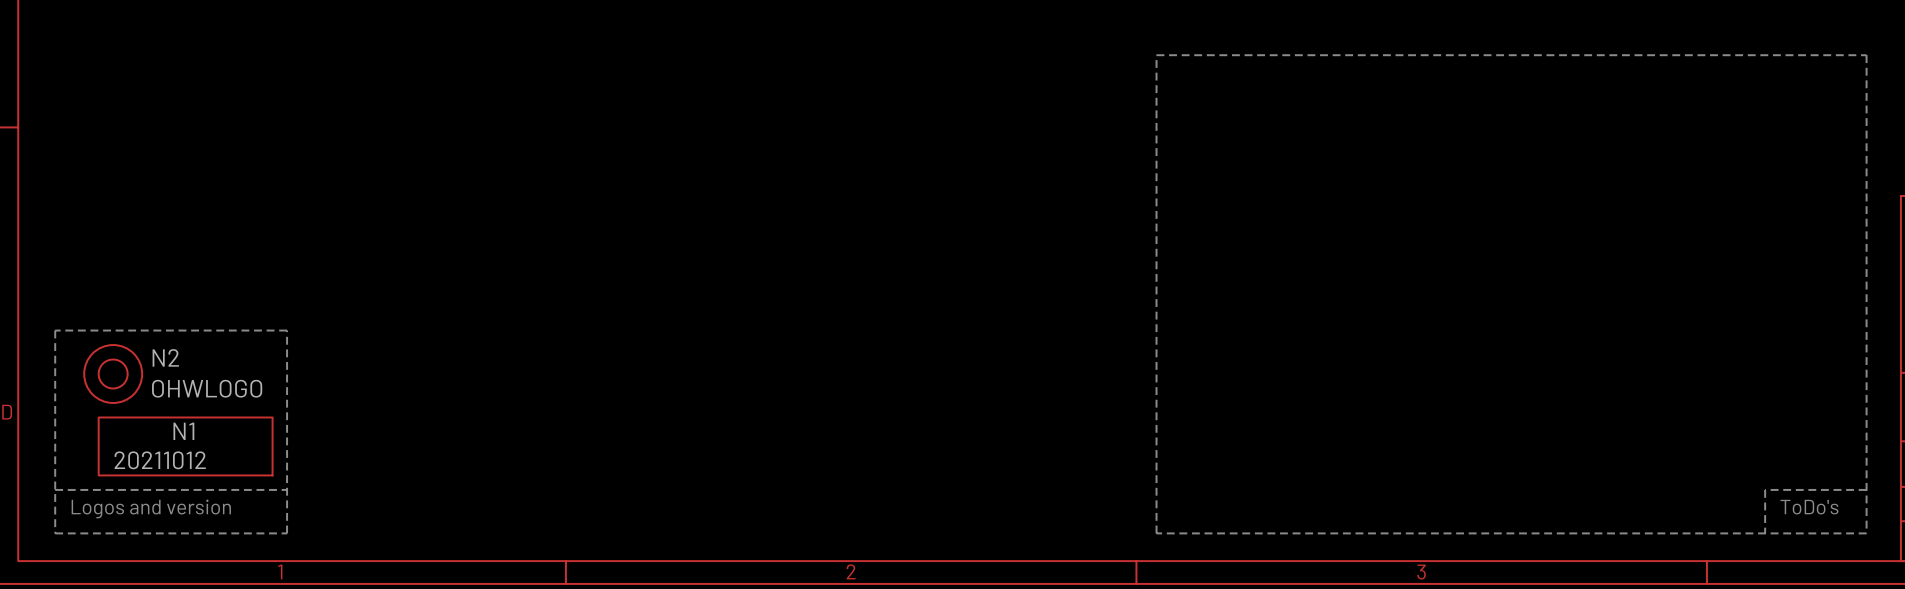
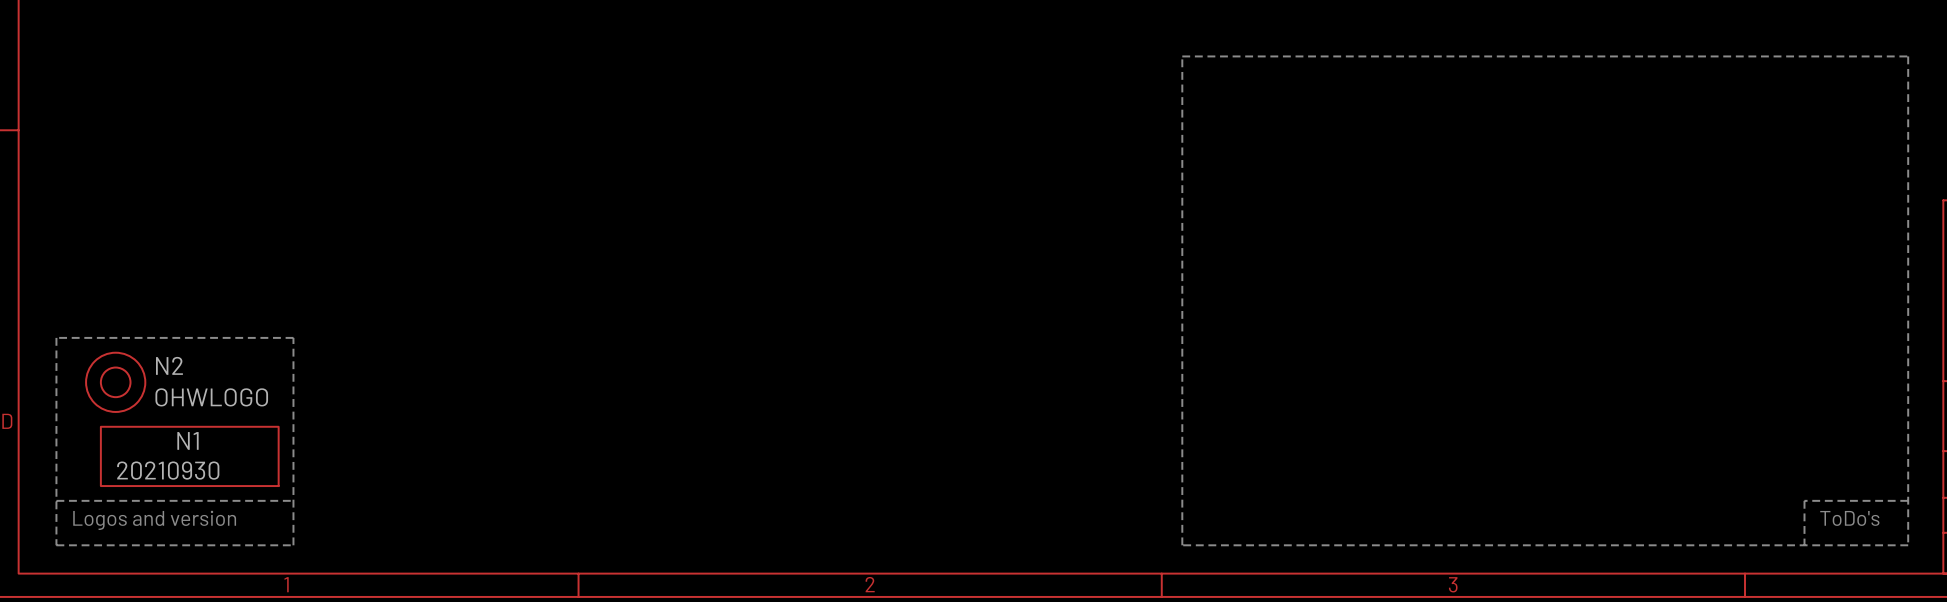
N1 value: 20211012 (160, 460) -> 20210930 (168, 470)

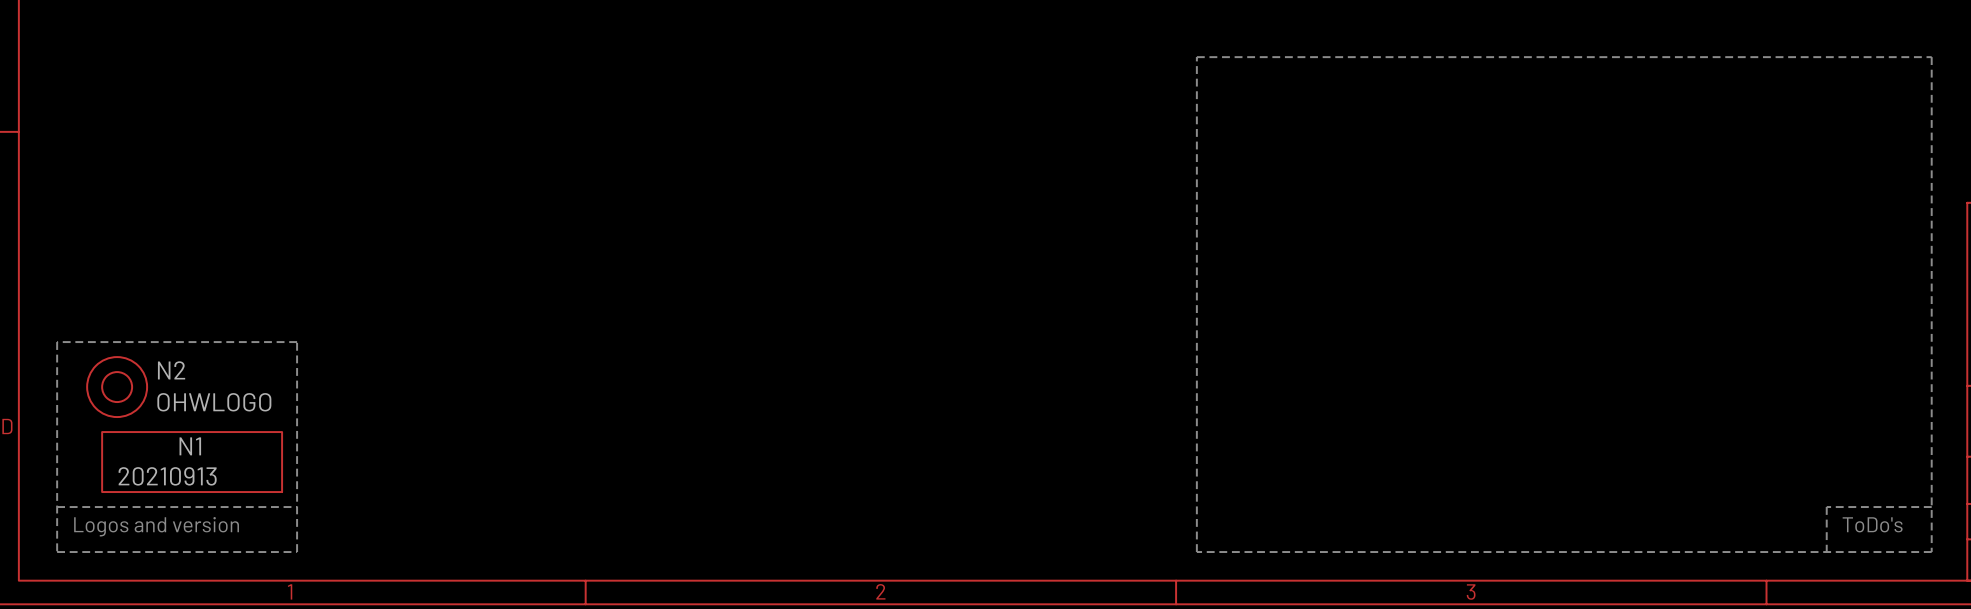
N1 value: 20210930 (168, 470) -> 20210913 (167, 476)

